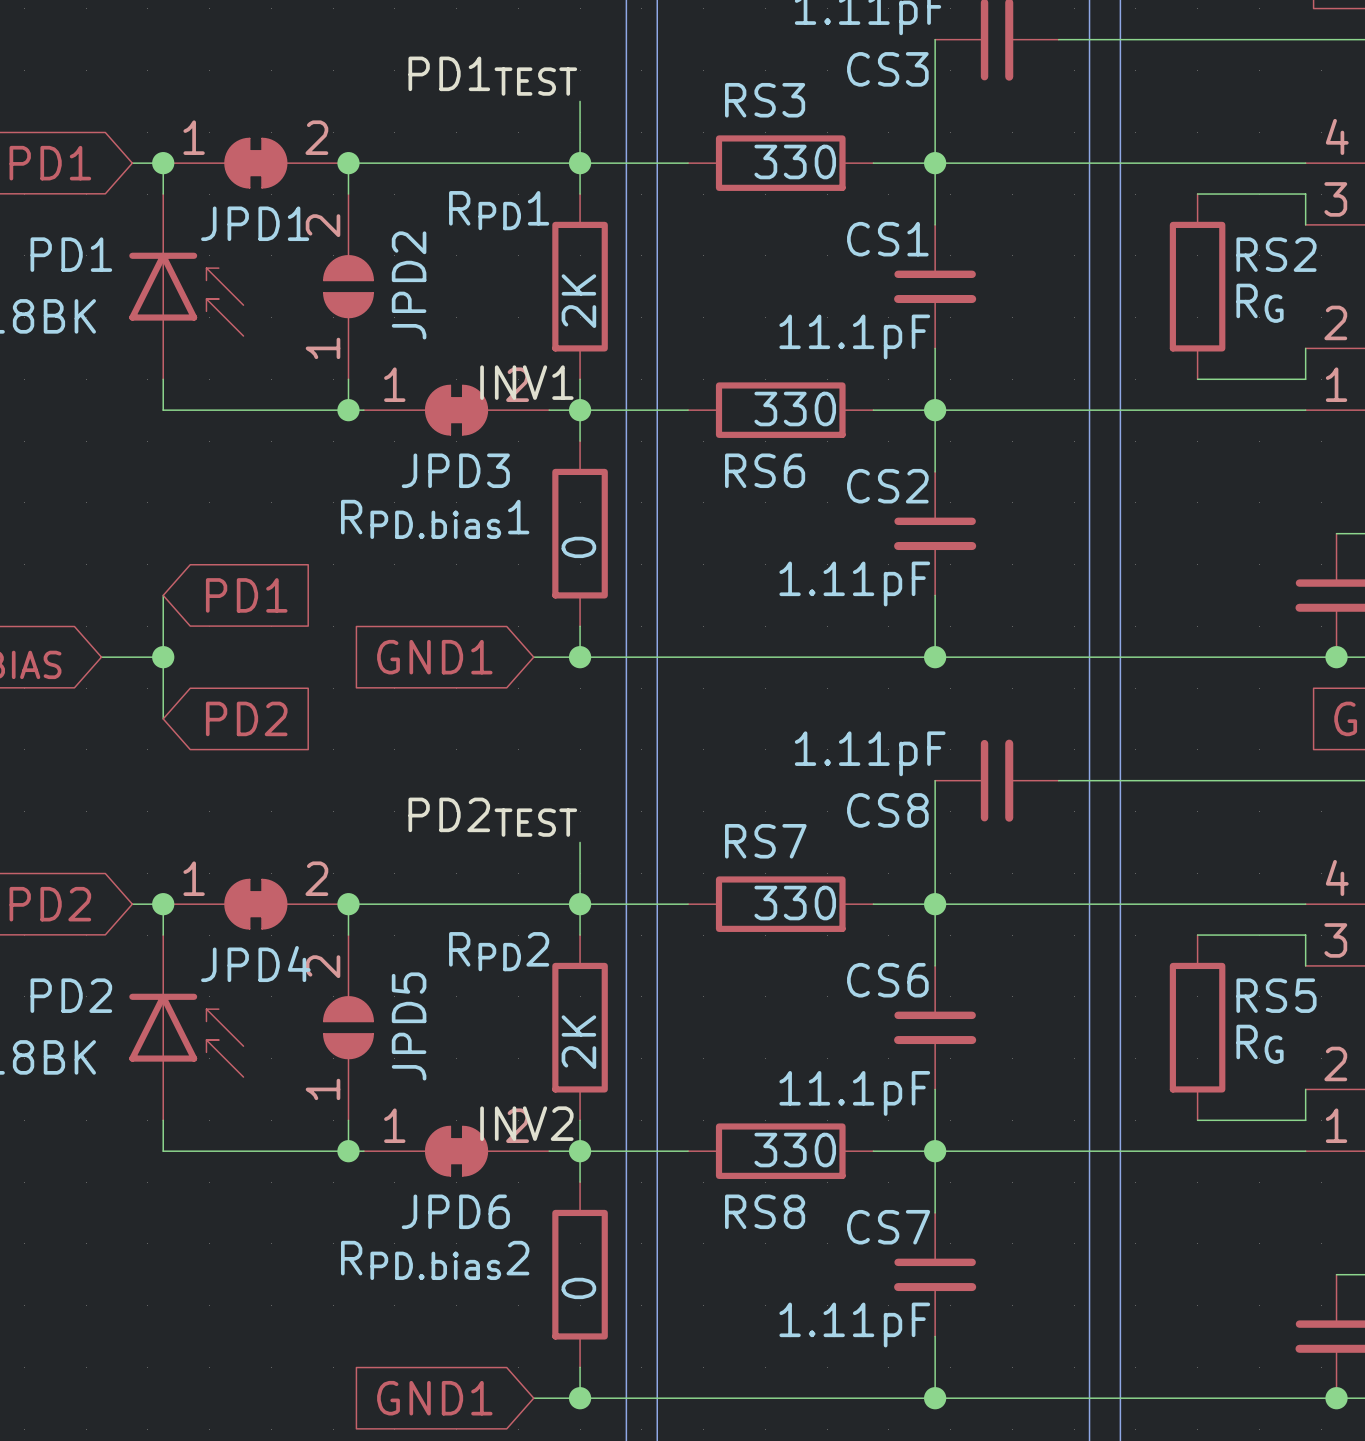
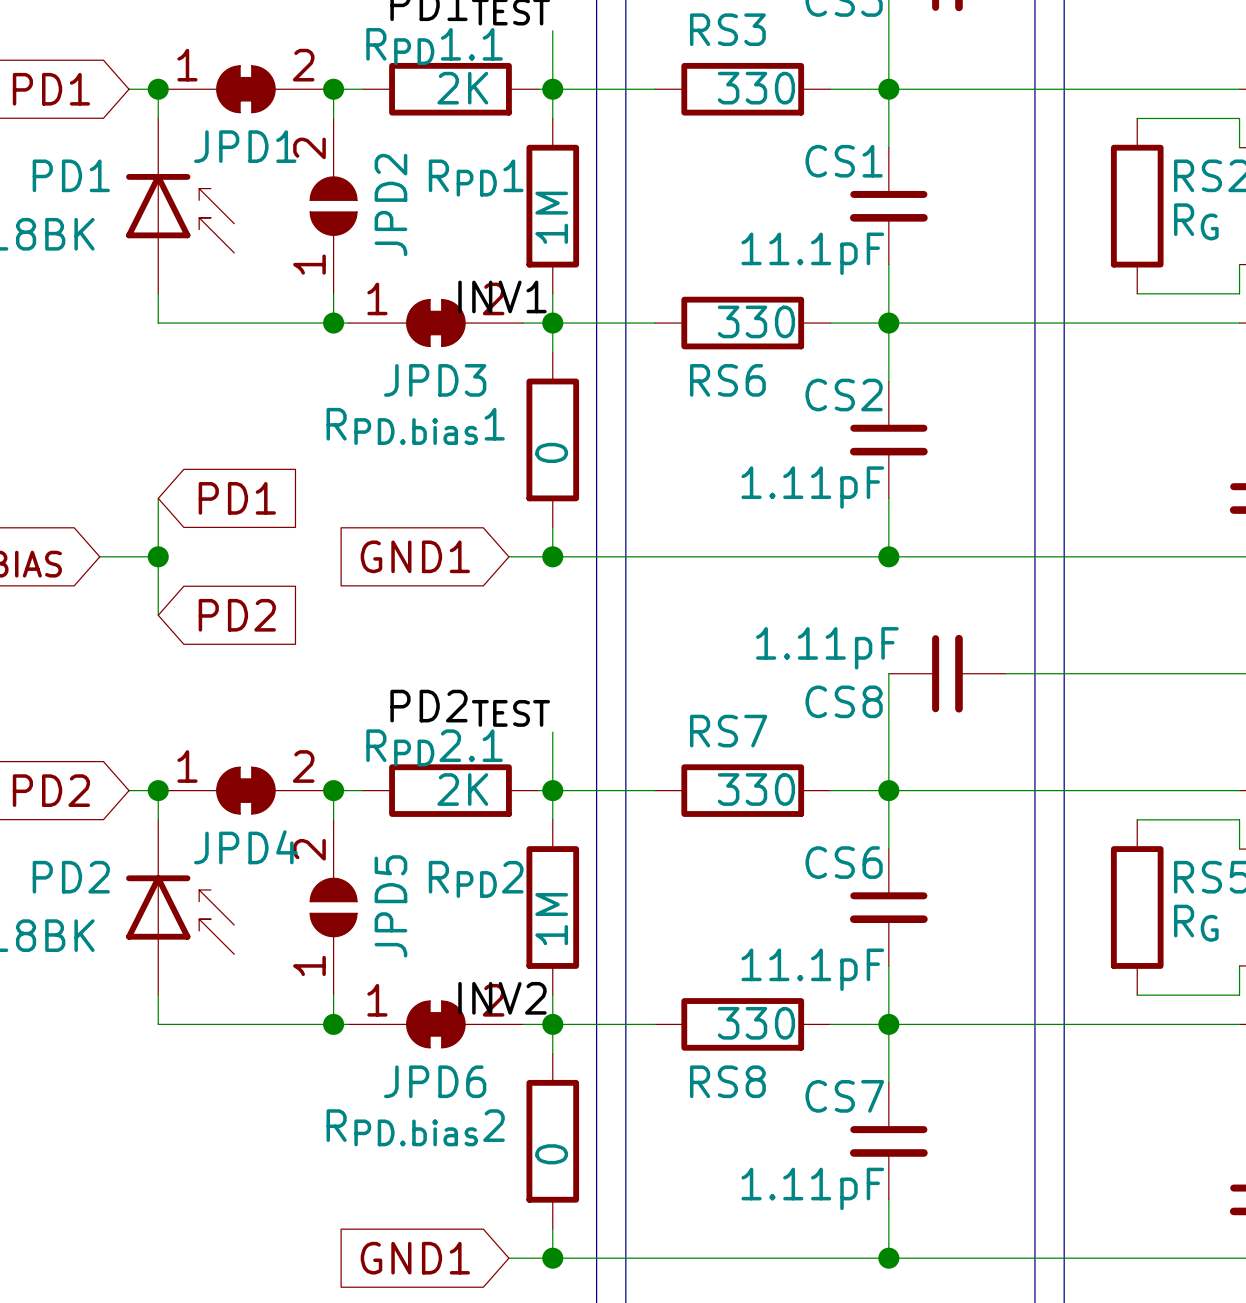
wire: (379, 163) (564, 163) -> none
RPD1.1: none -> 2K (450, 89)
RPD1 name position: RPD1 (499, 210) -> RPD1 (476, 178)
RPD1 value: 2K (578, 301) -> 1M (551, 217)
wire: (379, 904) (564, 904) -> none
RPD2.1: none -> 2K (450, 790)
RPD2 name position: RPD2 (499, 951) -> RPD2 (476, 879)
RPD2 value: 2K (578, 1042) -> 1M (551, 919)

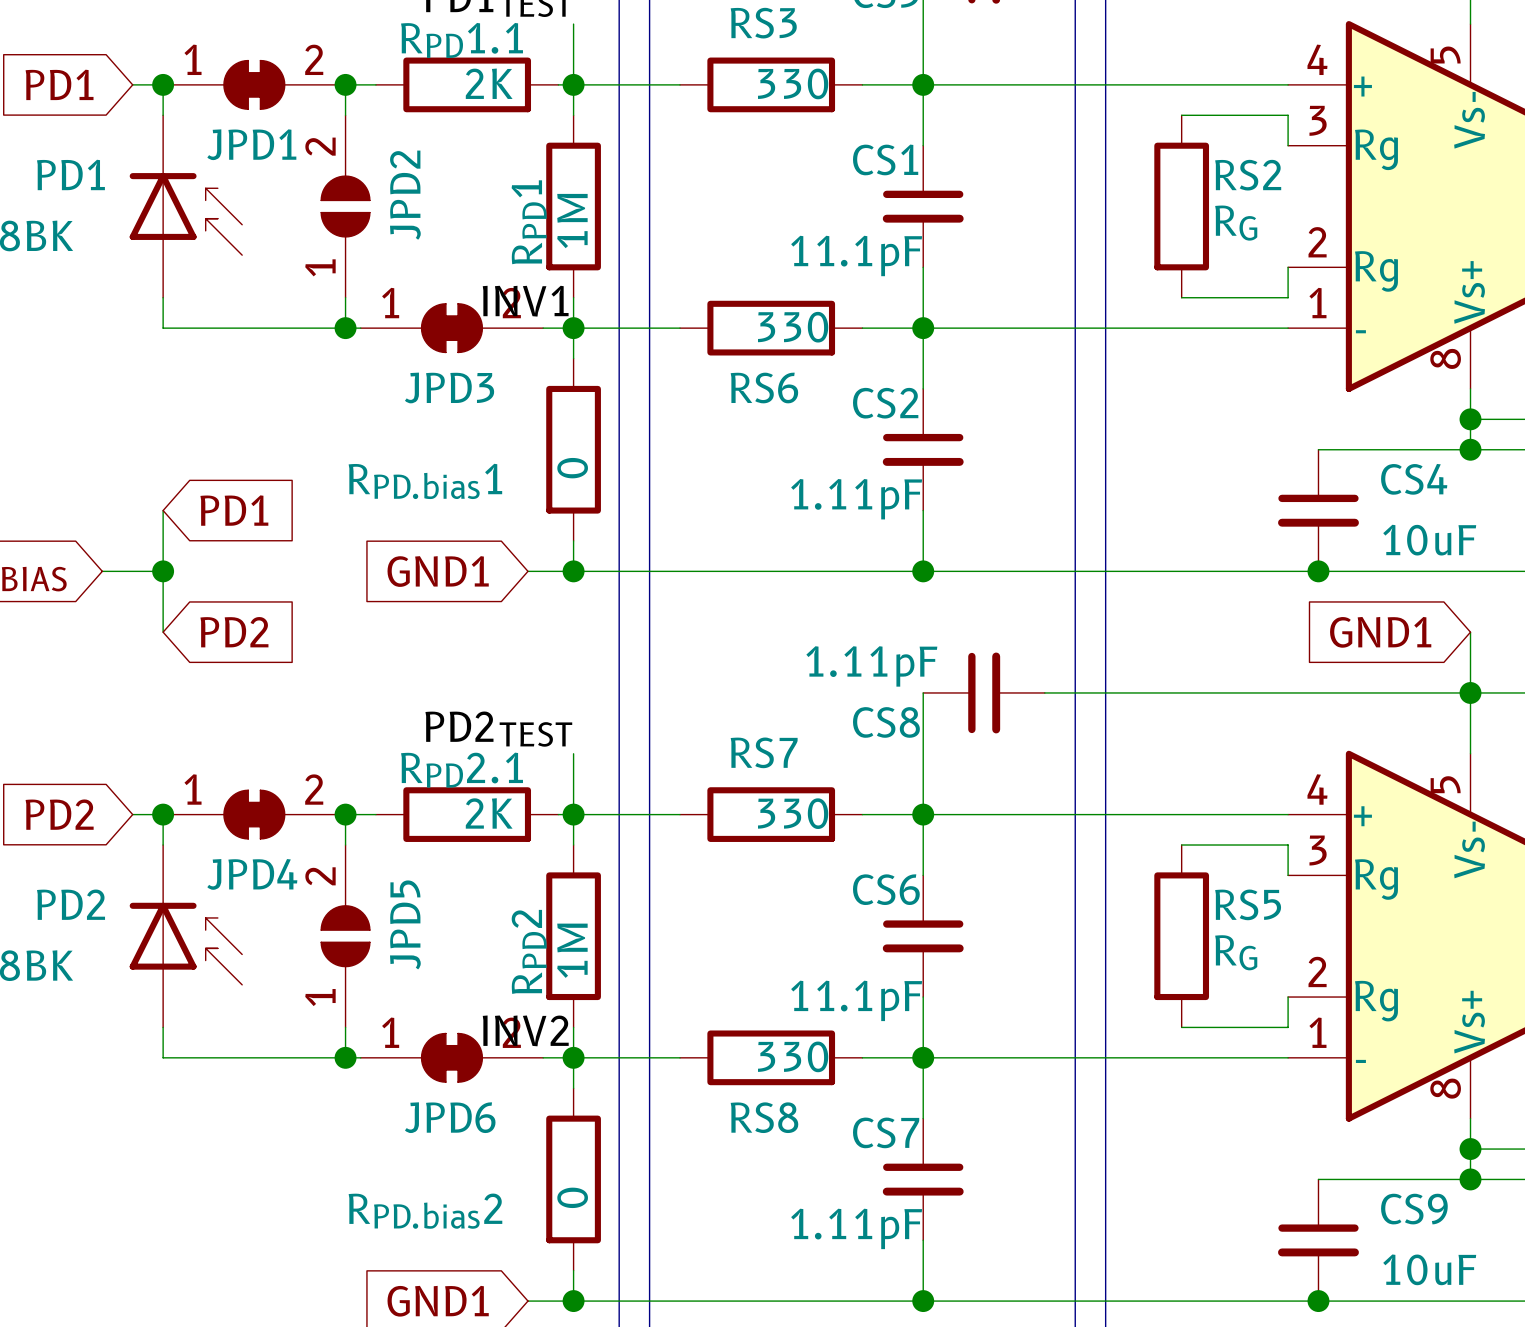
RPD1 name rotation: 0° (476, 178) -> 90° counterclockwise (529, 222)
RPD.bias1 name position: RPD.bias1 (415, 426) -> RPD.bias1 (425, 481)
RPD2 name rotation: 0° (476, 879) -> 90° counterclockwise (529, 951)
RPD.bias2 name position: RPD.bias2 (415, 1127) -> RPD.bias2 (425, 1211)

